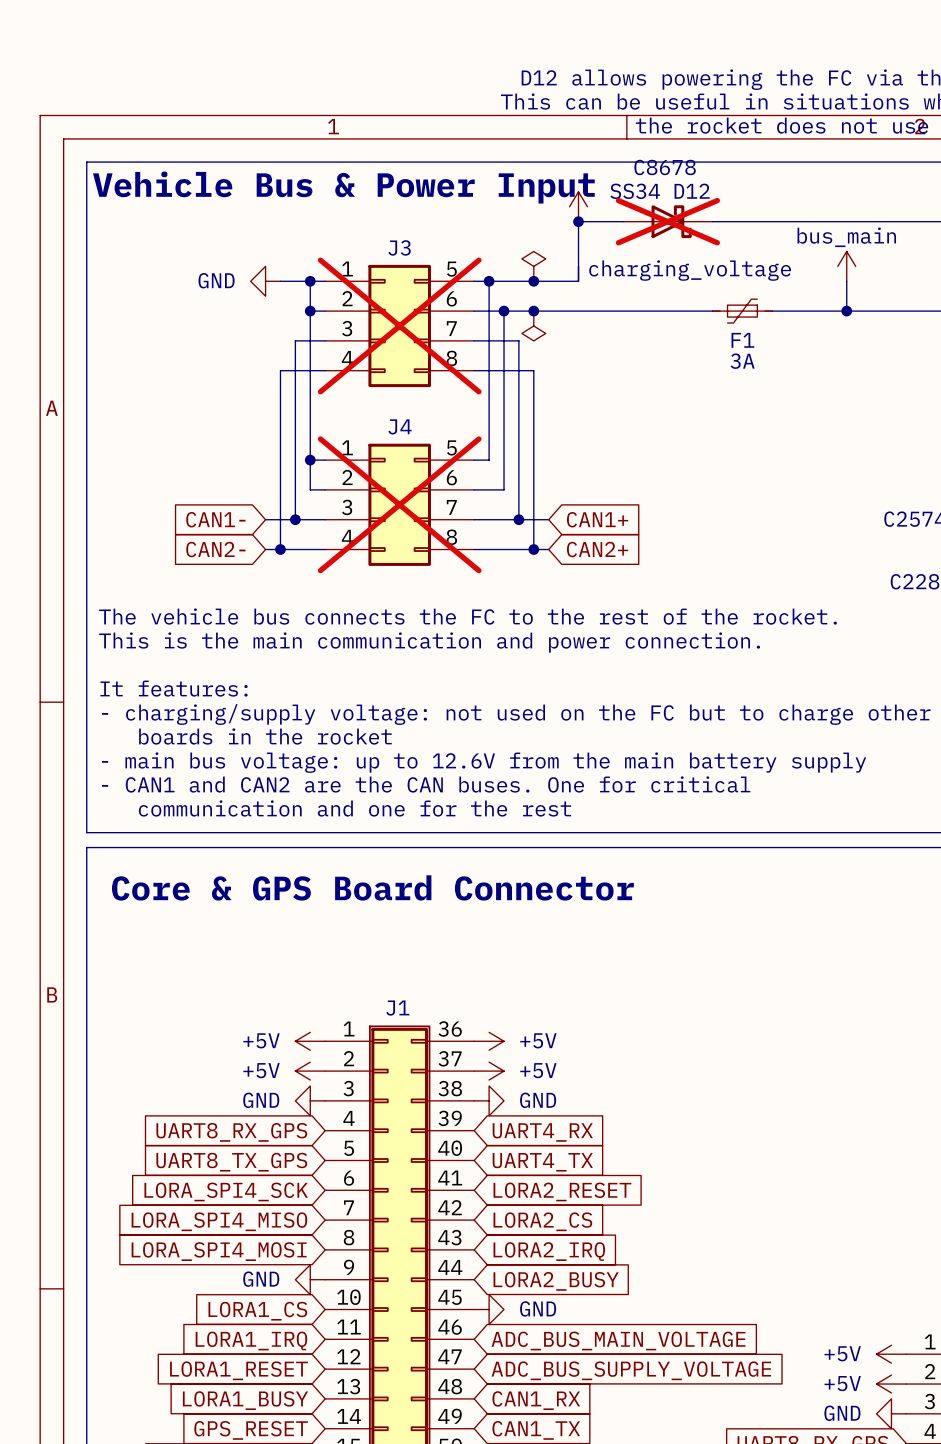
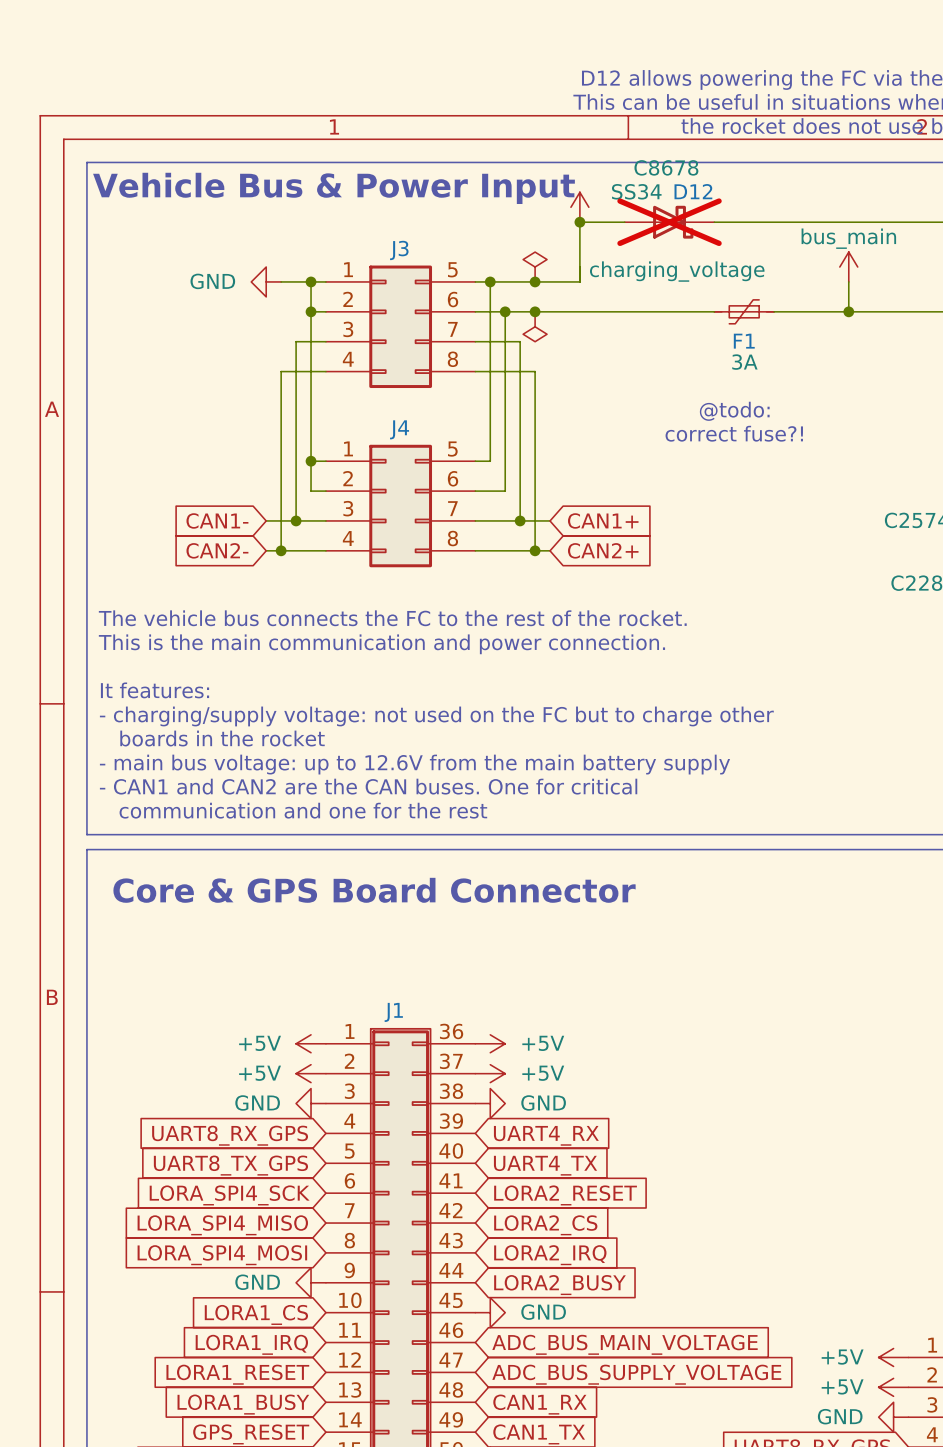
J3 do-not-place cross: (399, 325) -> none
text: none -> @todo: (734, 411)
text: none -> correct fuse?! (734, 433)
J4 do-not-place cross: (399, 504) -> none

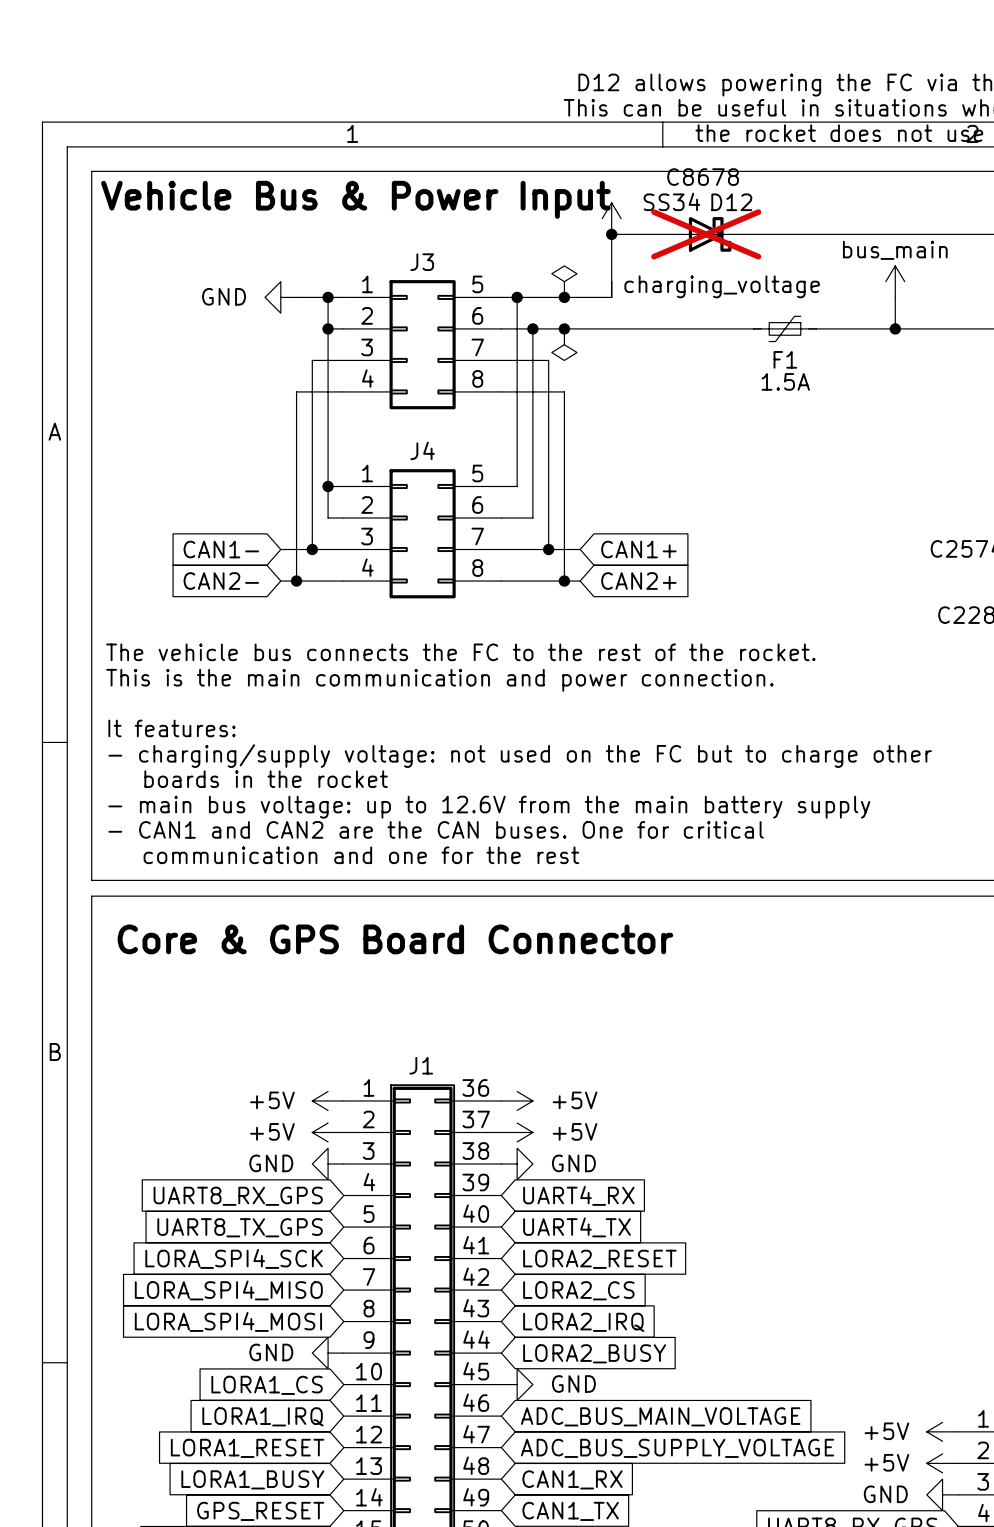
F1 value: 3A (744, 362) -> 1.5A (785, 381)
text: @todo: (734, 411) -> none
text: correct fuse?! (734, 433) -> none

